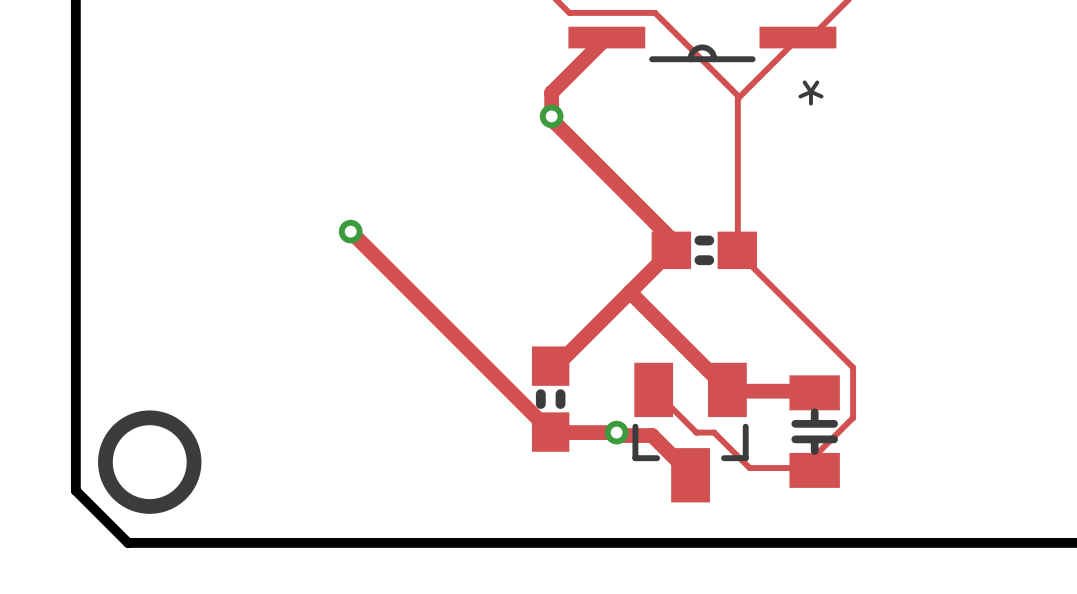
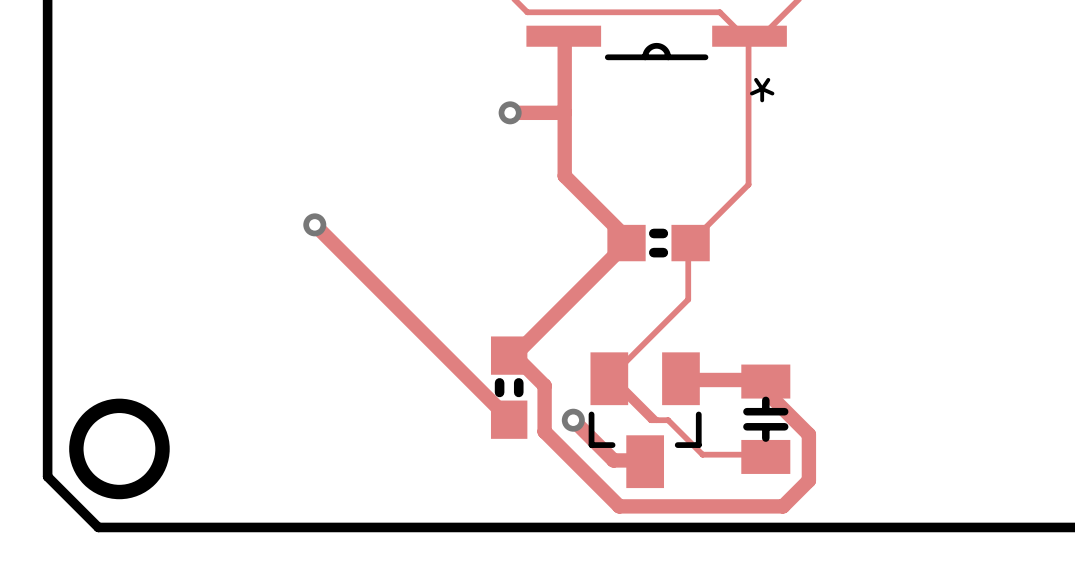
track: (655, 12) (739, 97) -> (610, 12) (719, 12) (745, 38) (749, 36)
track: (606, 37) (551, 92) (551, 116) (554, 122) (669, 237) (669, 243) -> (563, 36) (564, 176) (625, 236)
track: (796, 39) (737, 98) (737, 249) -> (748, 38) (748, 184) (691, 242)
track: none -> (510, 112) (564, 112)
track: (737, 250) (853, 367) (853, 417) (814, 456) (814, 468) -> (690, 243) (688, 244) (688, 299) (609, 378) (613, 377) (656, 420)
track: (629, 292) (727, 389) -> none
track: none -> (509, 355) (518, 359) (544, 385) (544, 431) (619, 506) (783, 506) (808, 480) (808, 434) (768, 394) (765, 381)
track: (545, 426) (551, 432) (616, 432) (622, 435) (652, 435) (690, 473) -> (573, 420) (613, 460) (645, 460)

